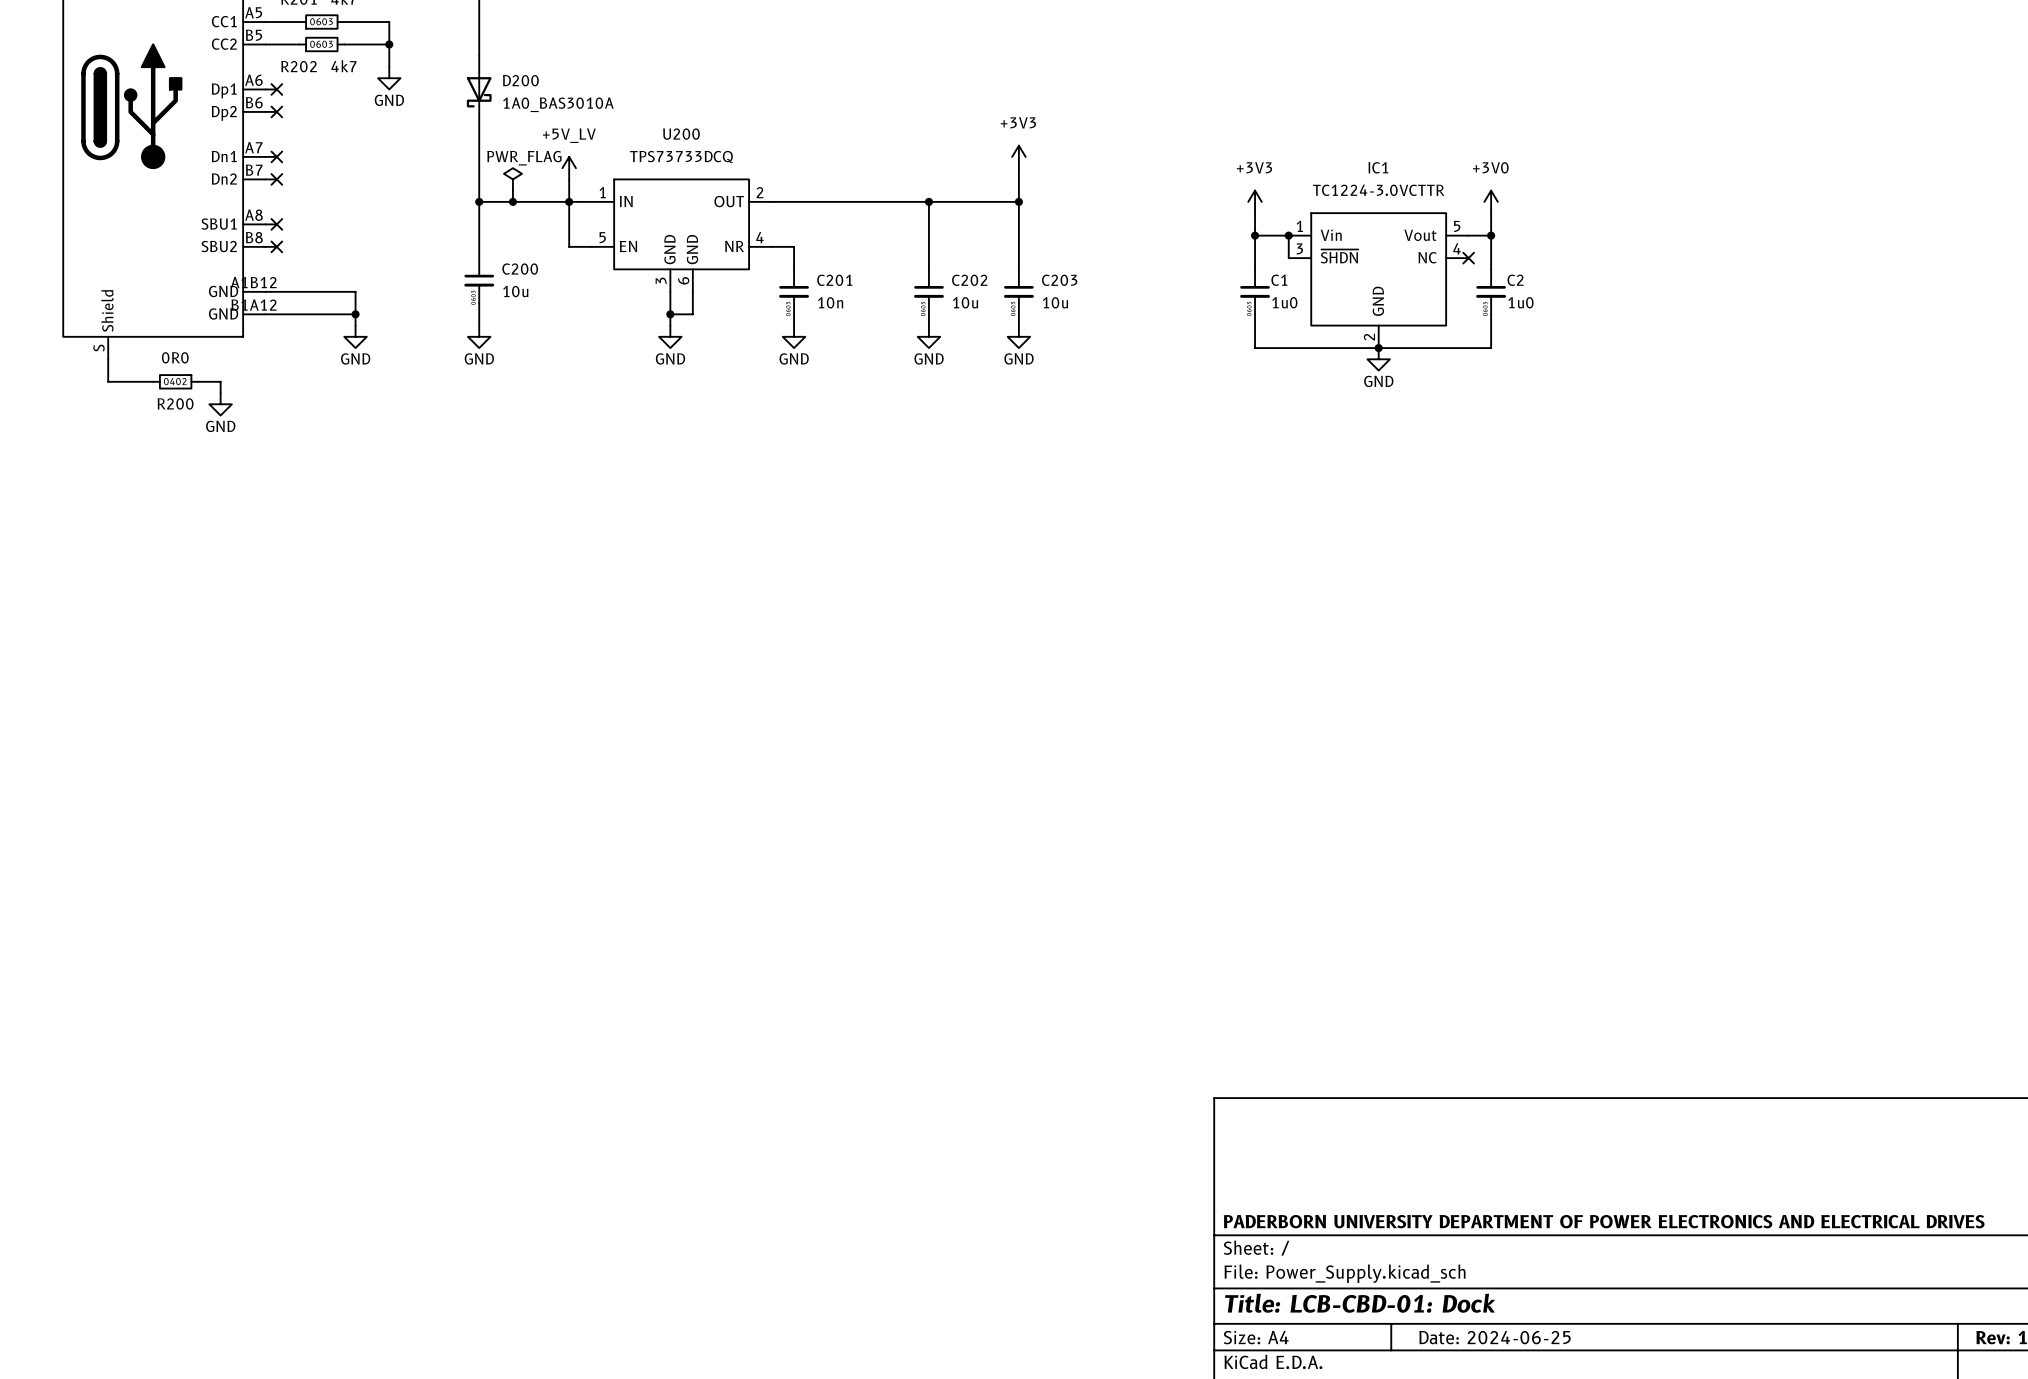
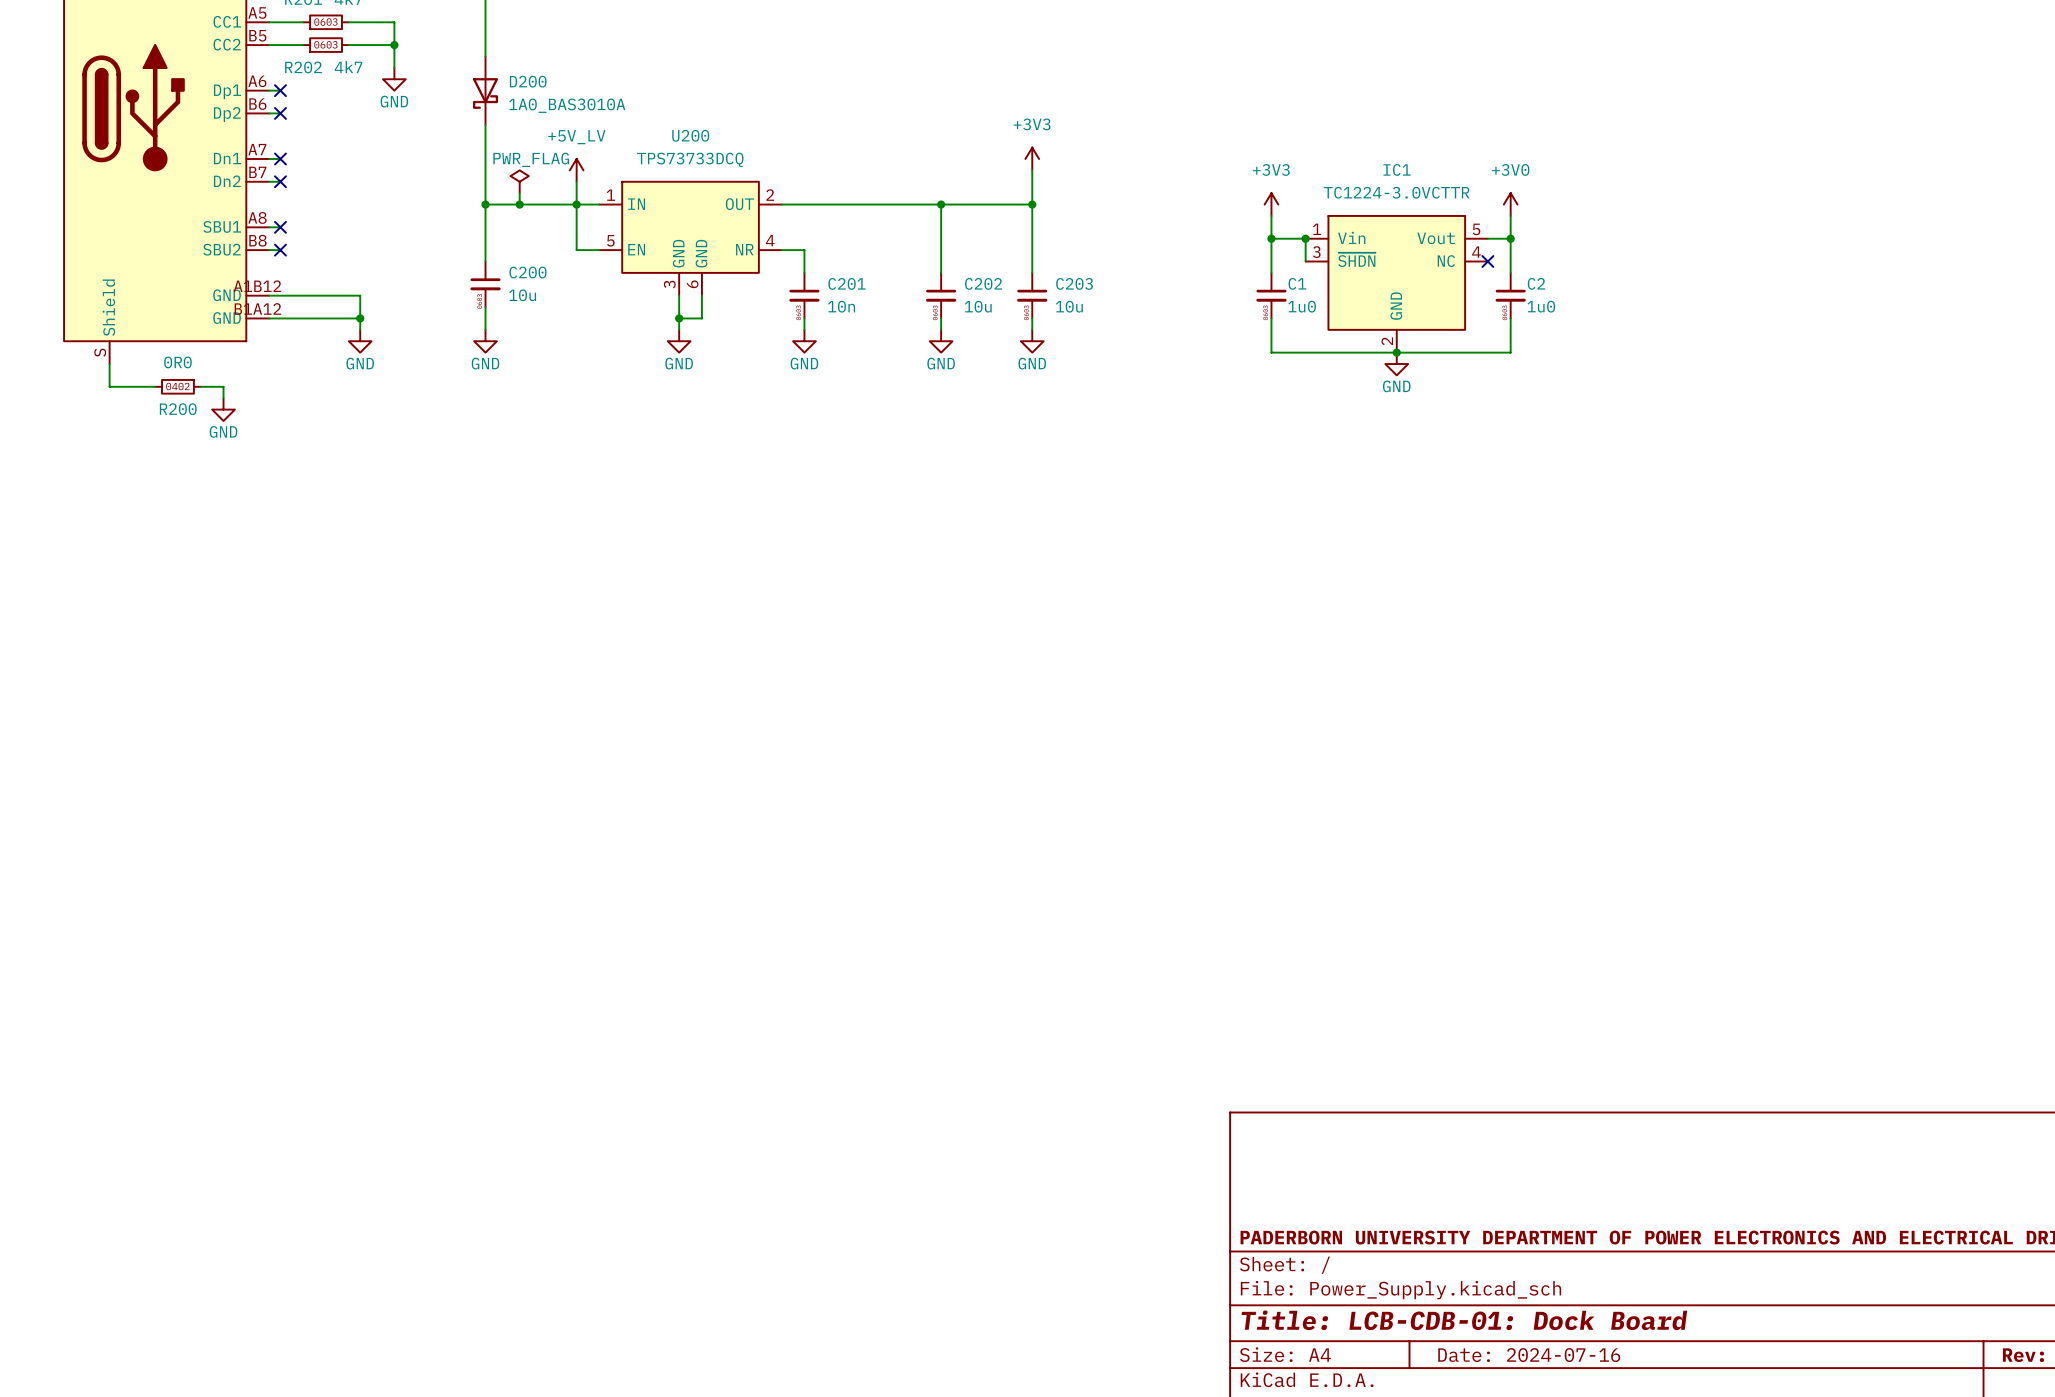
title block: Title: LCB-CBD-01: Dock (1360, 1303) -> Title: LCB-CDB-01: Dock Board (1464, 1320)
title block: Date: 2024-06-25 (1495, 1337) -> Date: 2024-07-16 (1529, 1355)

